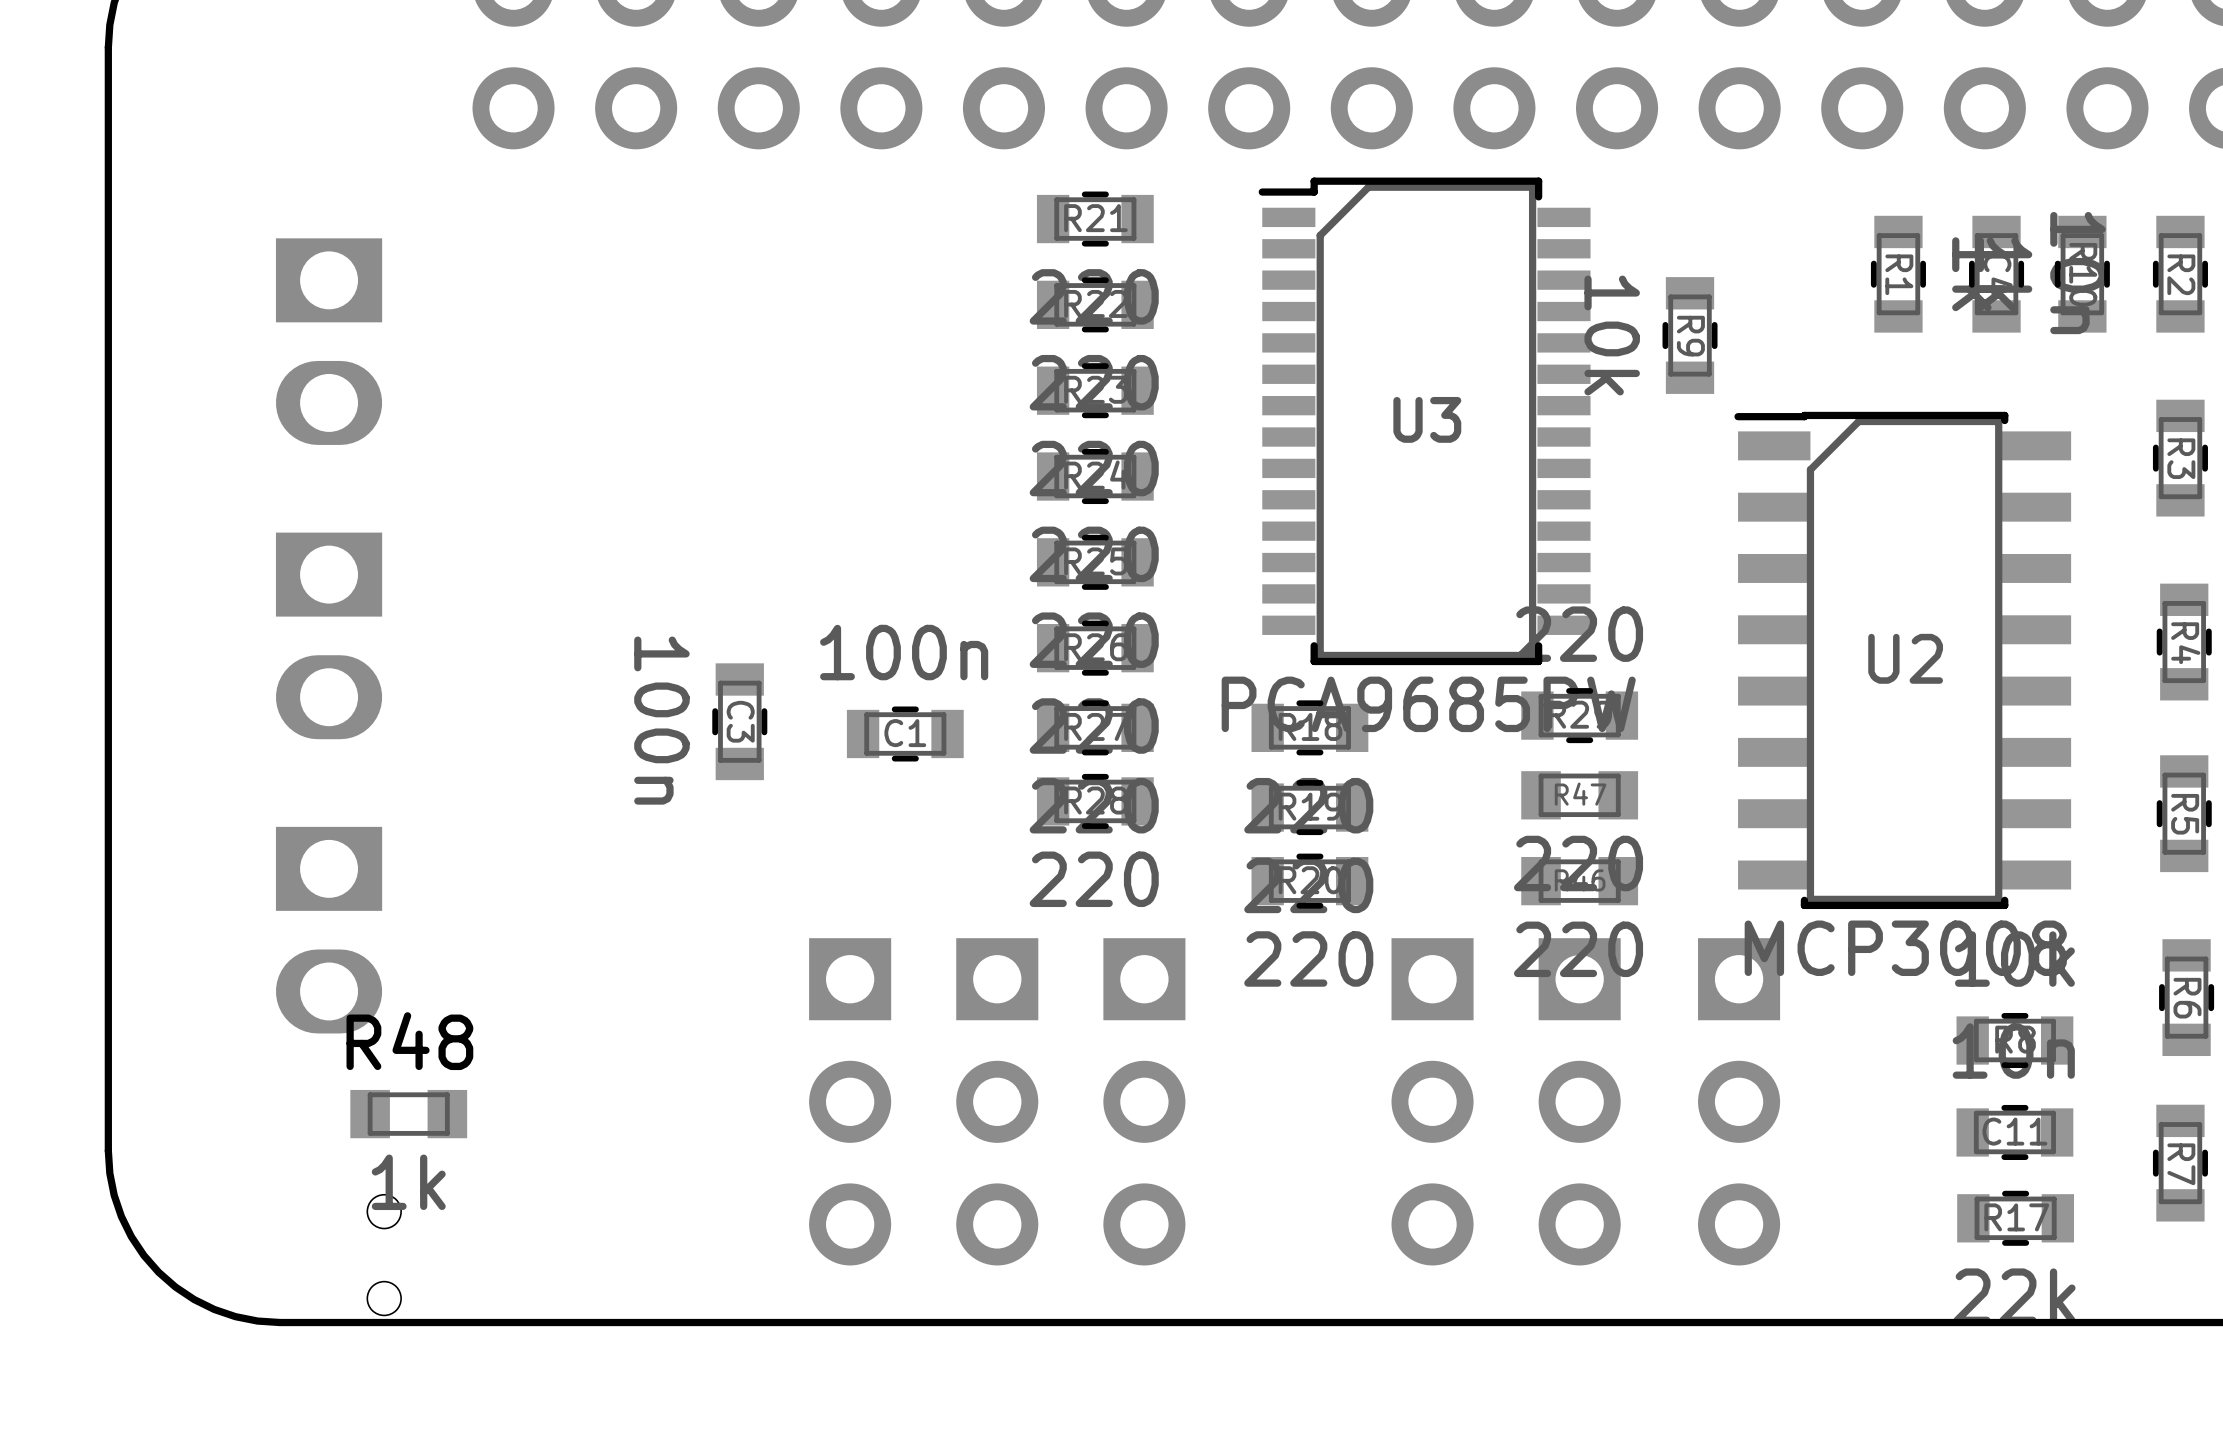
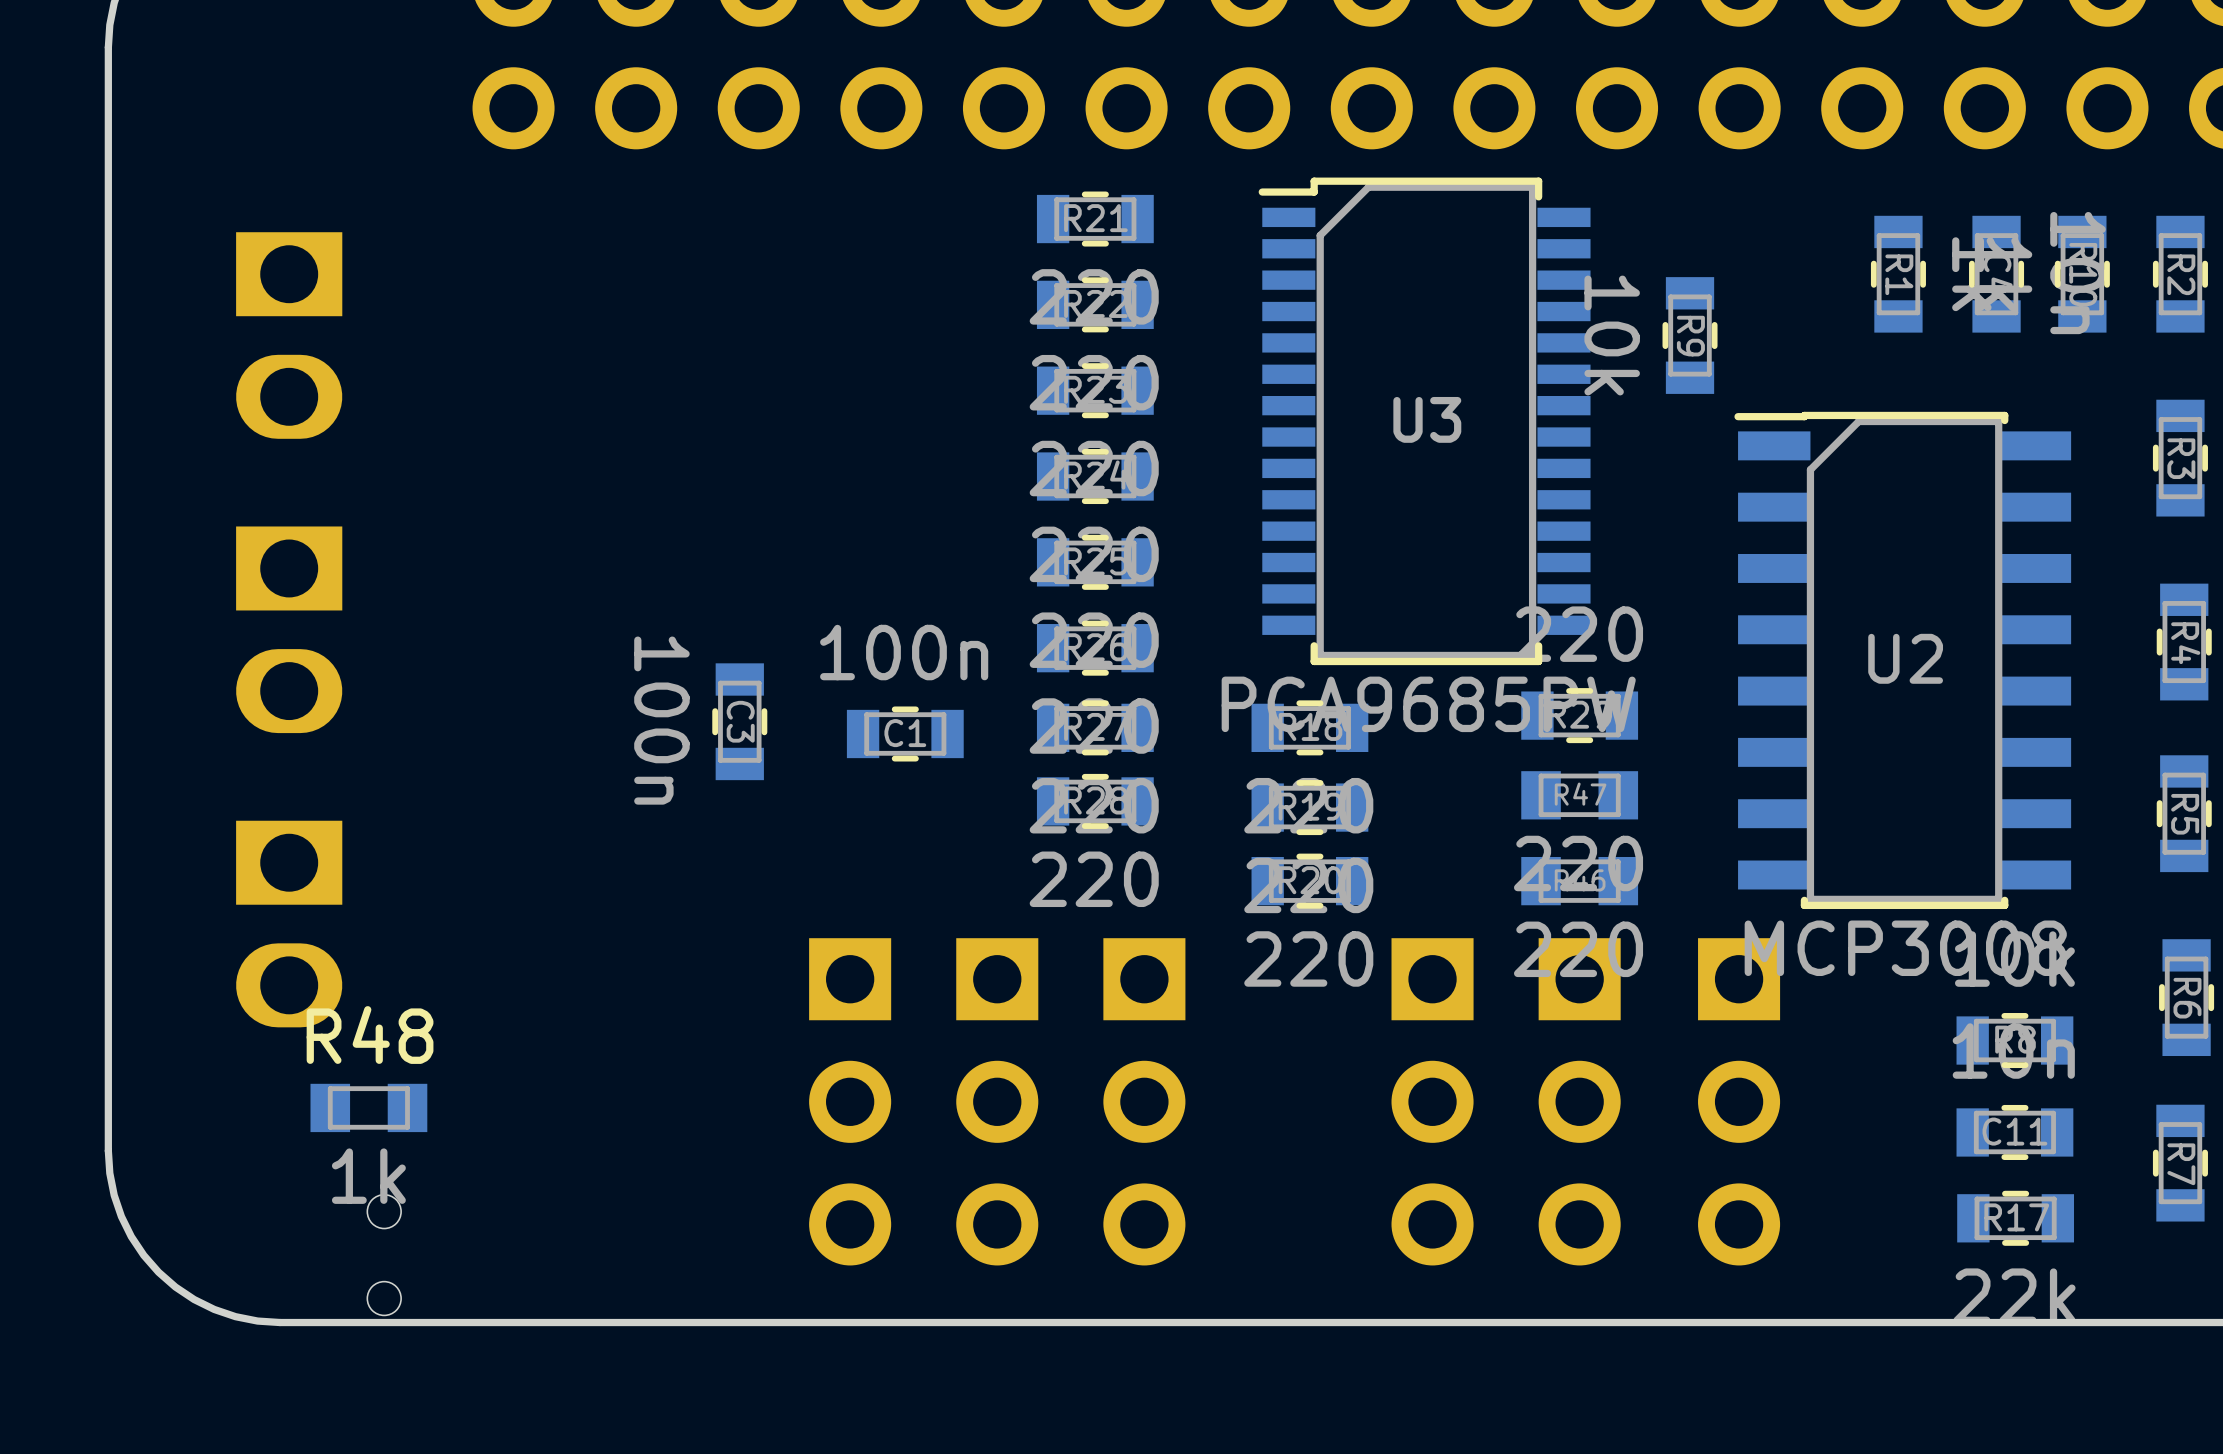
part position: (329, 341) -> (289, 335)
part position: (329, 635) -> (289, 629)
part position: (329, 930) -> (289, 924)
R48 position: (408, 1114) -> (368, 1107)

